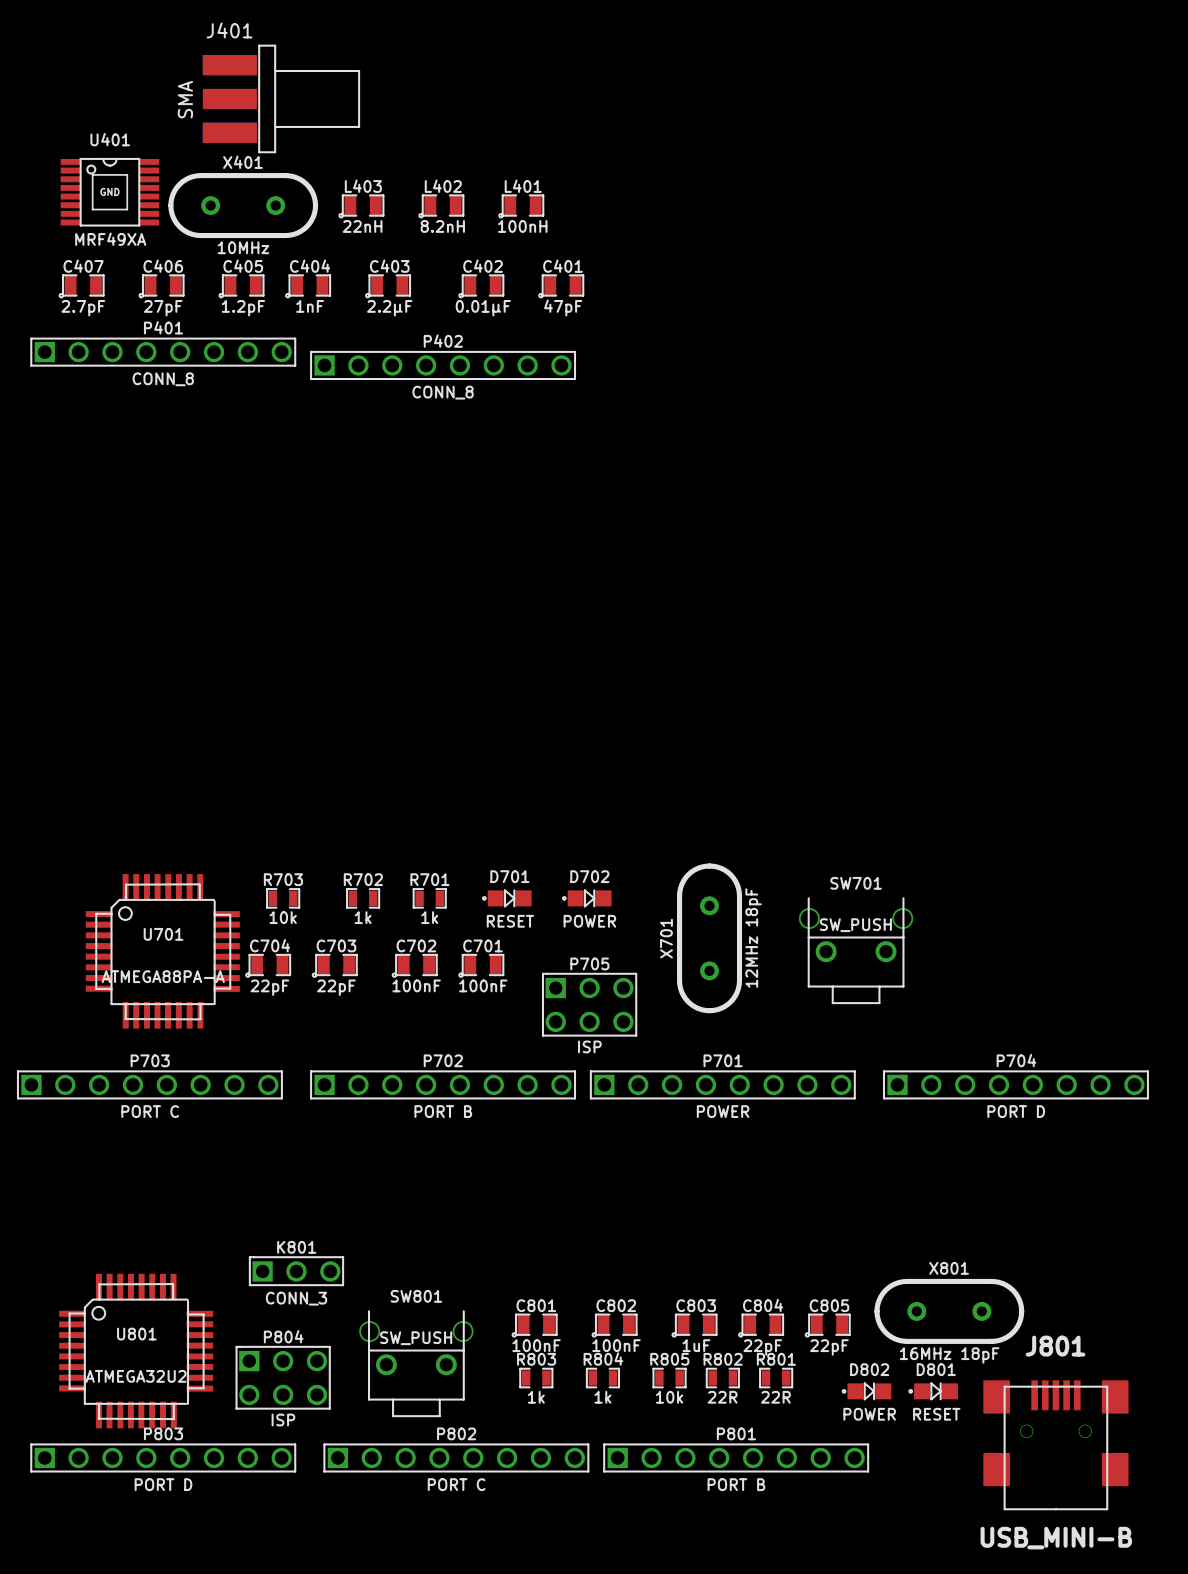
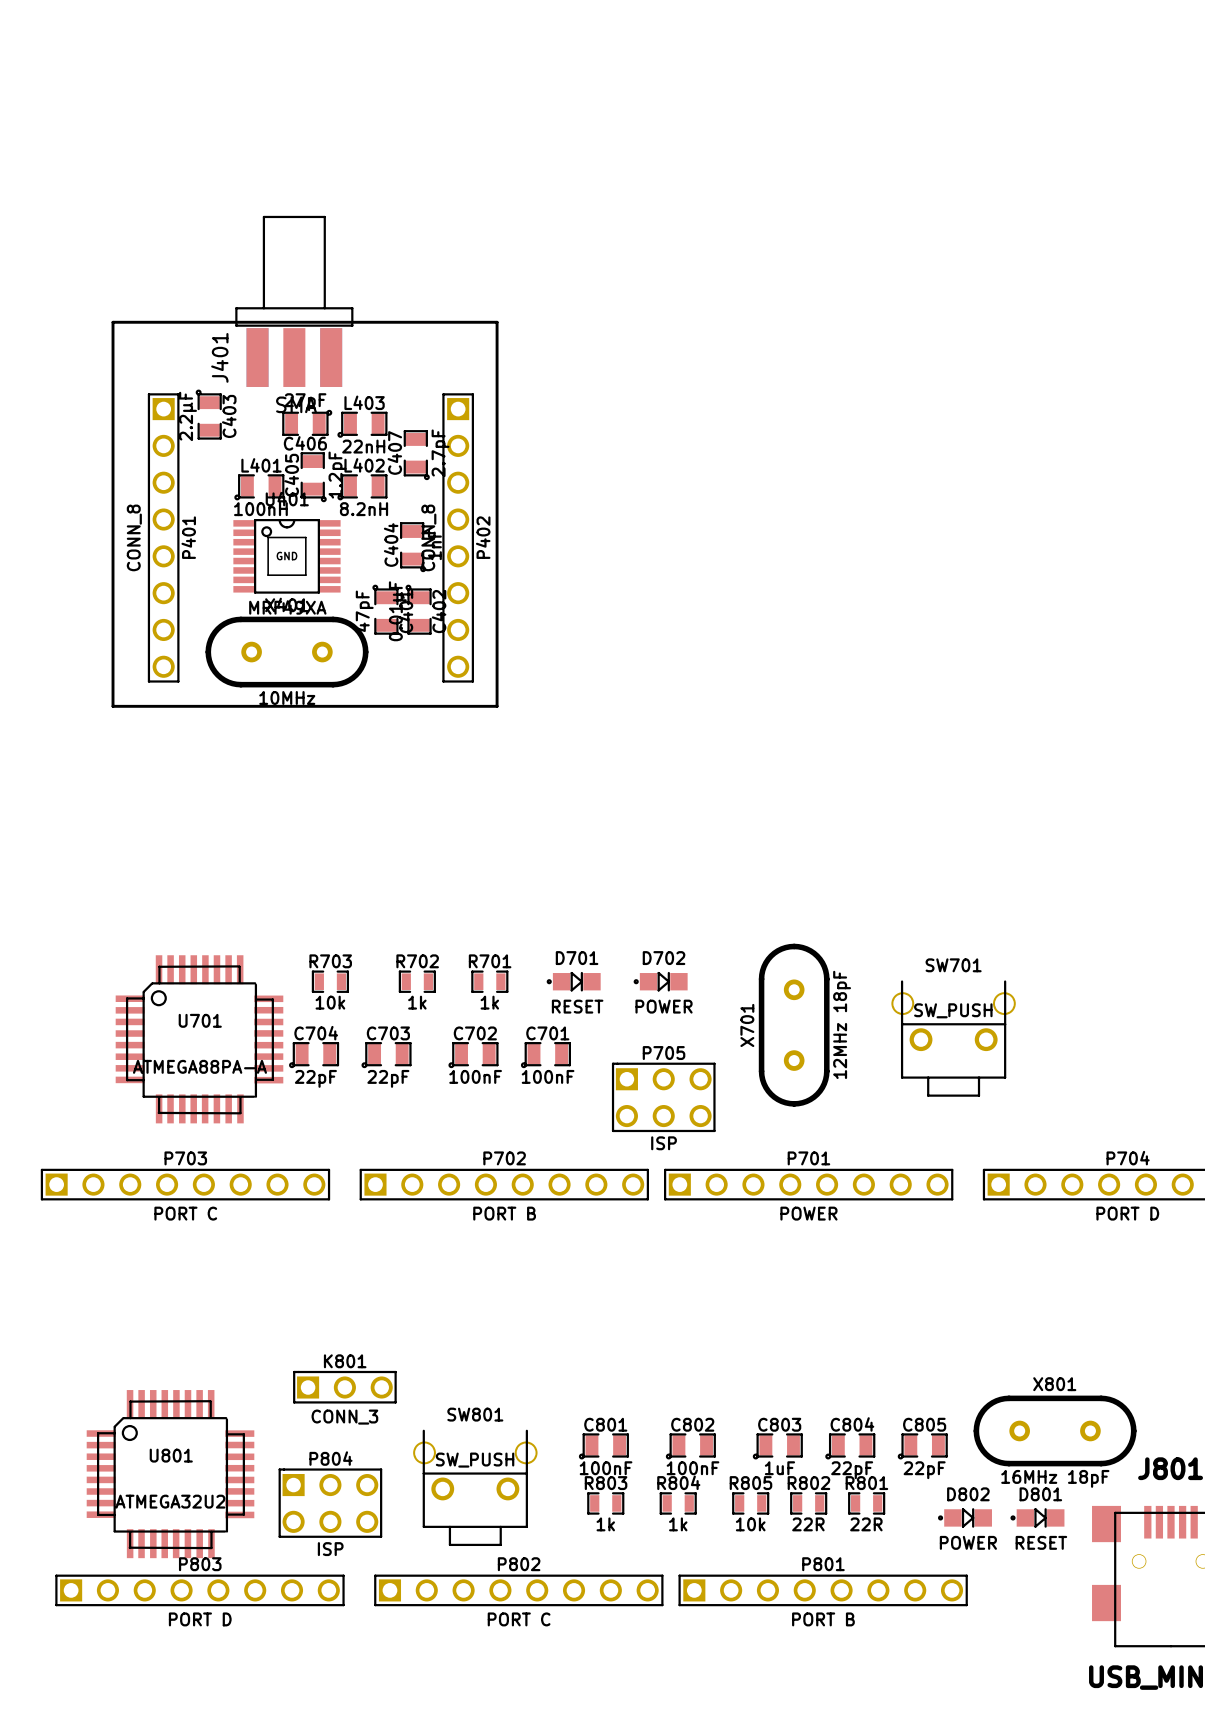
J401 rotation: 0° (281, 98) -> 90° counterclockwise (294, 301)
J401 position: (281, 98) -> (294, 301)
U401 position: (109, 192) -> (286, 556)
X401 position: (243, 205) -> (286, 652)
L403 position: (361, 206) -> (362, 424)
L402 position: (441, 206) -> (362, 487)
L401 position: (521, 206) -> (259, 487)
C407 rotation: 0° (81, 286) -> 90° counterclockwise (416, 455)
C407 position: (81, 286) -> (416, 455)
C406 rotation: 0° (161, 286) -> 180° (307, 422)
C406 position: (161, 286) -> (307, 422)
C405 rotation: 0° (241, 286) -> 90° counterclockwise (313, 477)
C405 position: (241, 286) -> (313, 477)
C404 rotation: 0° (308, 286) -> 90° counterclockwise (413, 547)
C404 position: (308, 286) -> (413, 547)
C403 rotation: 0° (388, 286) -> 90° clockwise (208, 414)
C403 position: (388, 286) -> (208, 414)
C402 rotation: 0° (481, 286) -> 90° clockwise (418, 609)
C402 position: (481, 286) -> (418, 609)
C401 rotation: 0° (561, 286) -> 90° clockwise (385, 609)
C401 position: (561, 286) -> (385, 609)
line: none -> (113, 322) (113, 706) (497, 706) (497, 322) (113, 322)
P401 rotation: 0° (163, 352) -> 90° clockwise (163, 537)
P402 rotation: 0° (443, 365) -> 90° clockwise (458, 537)

